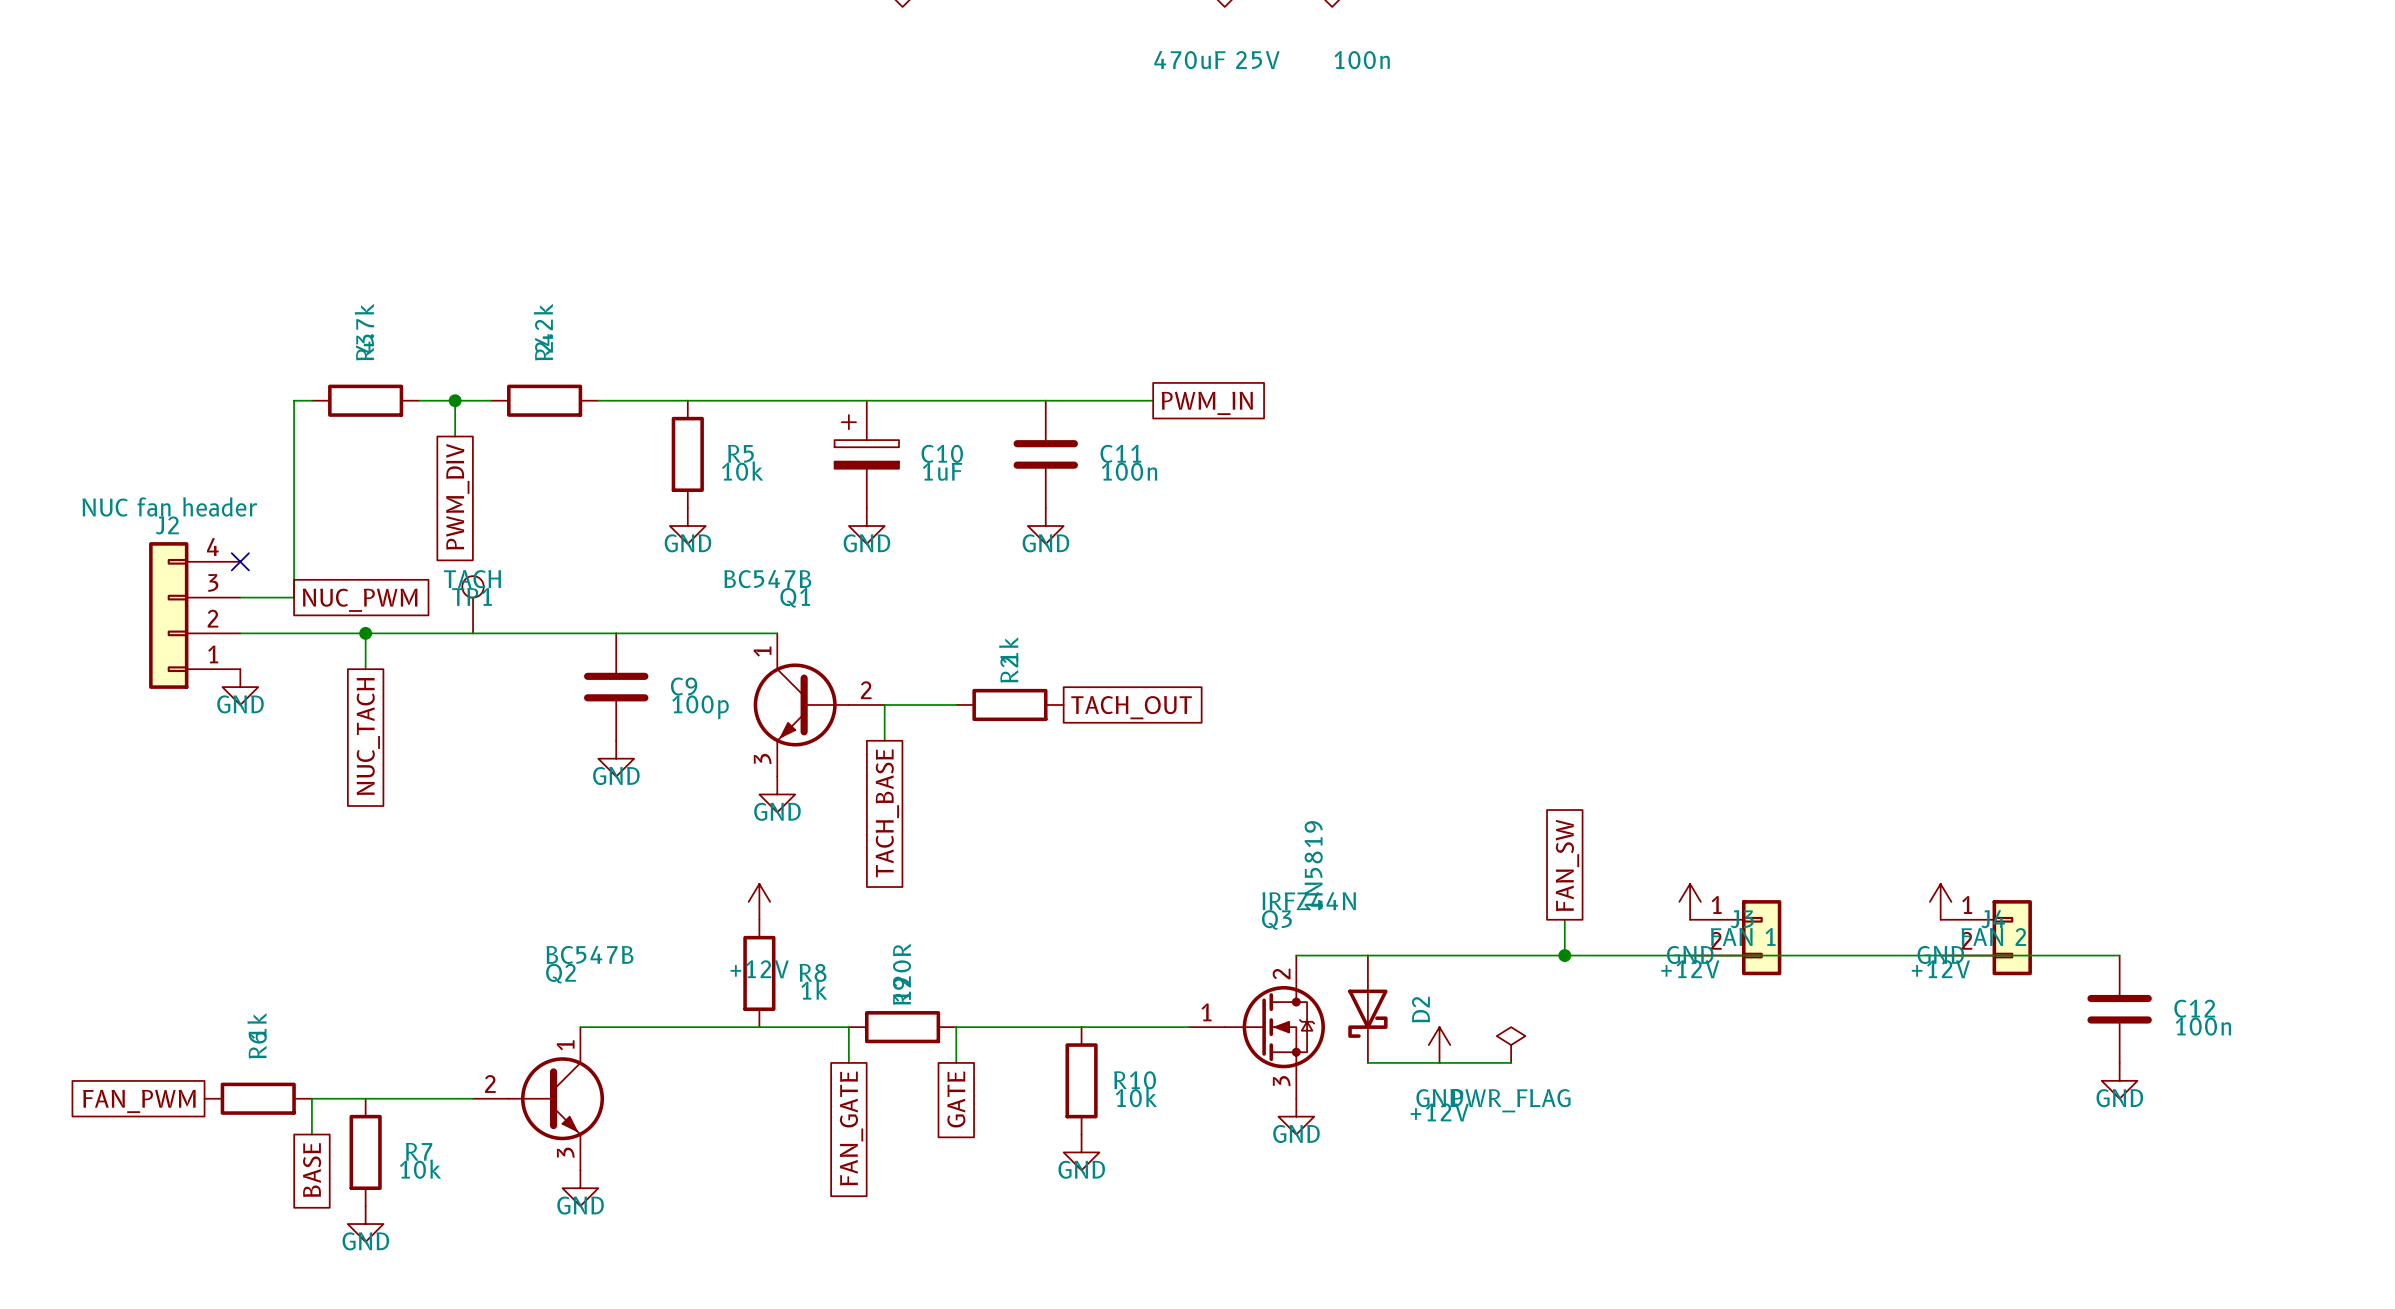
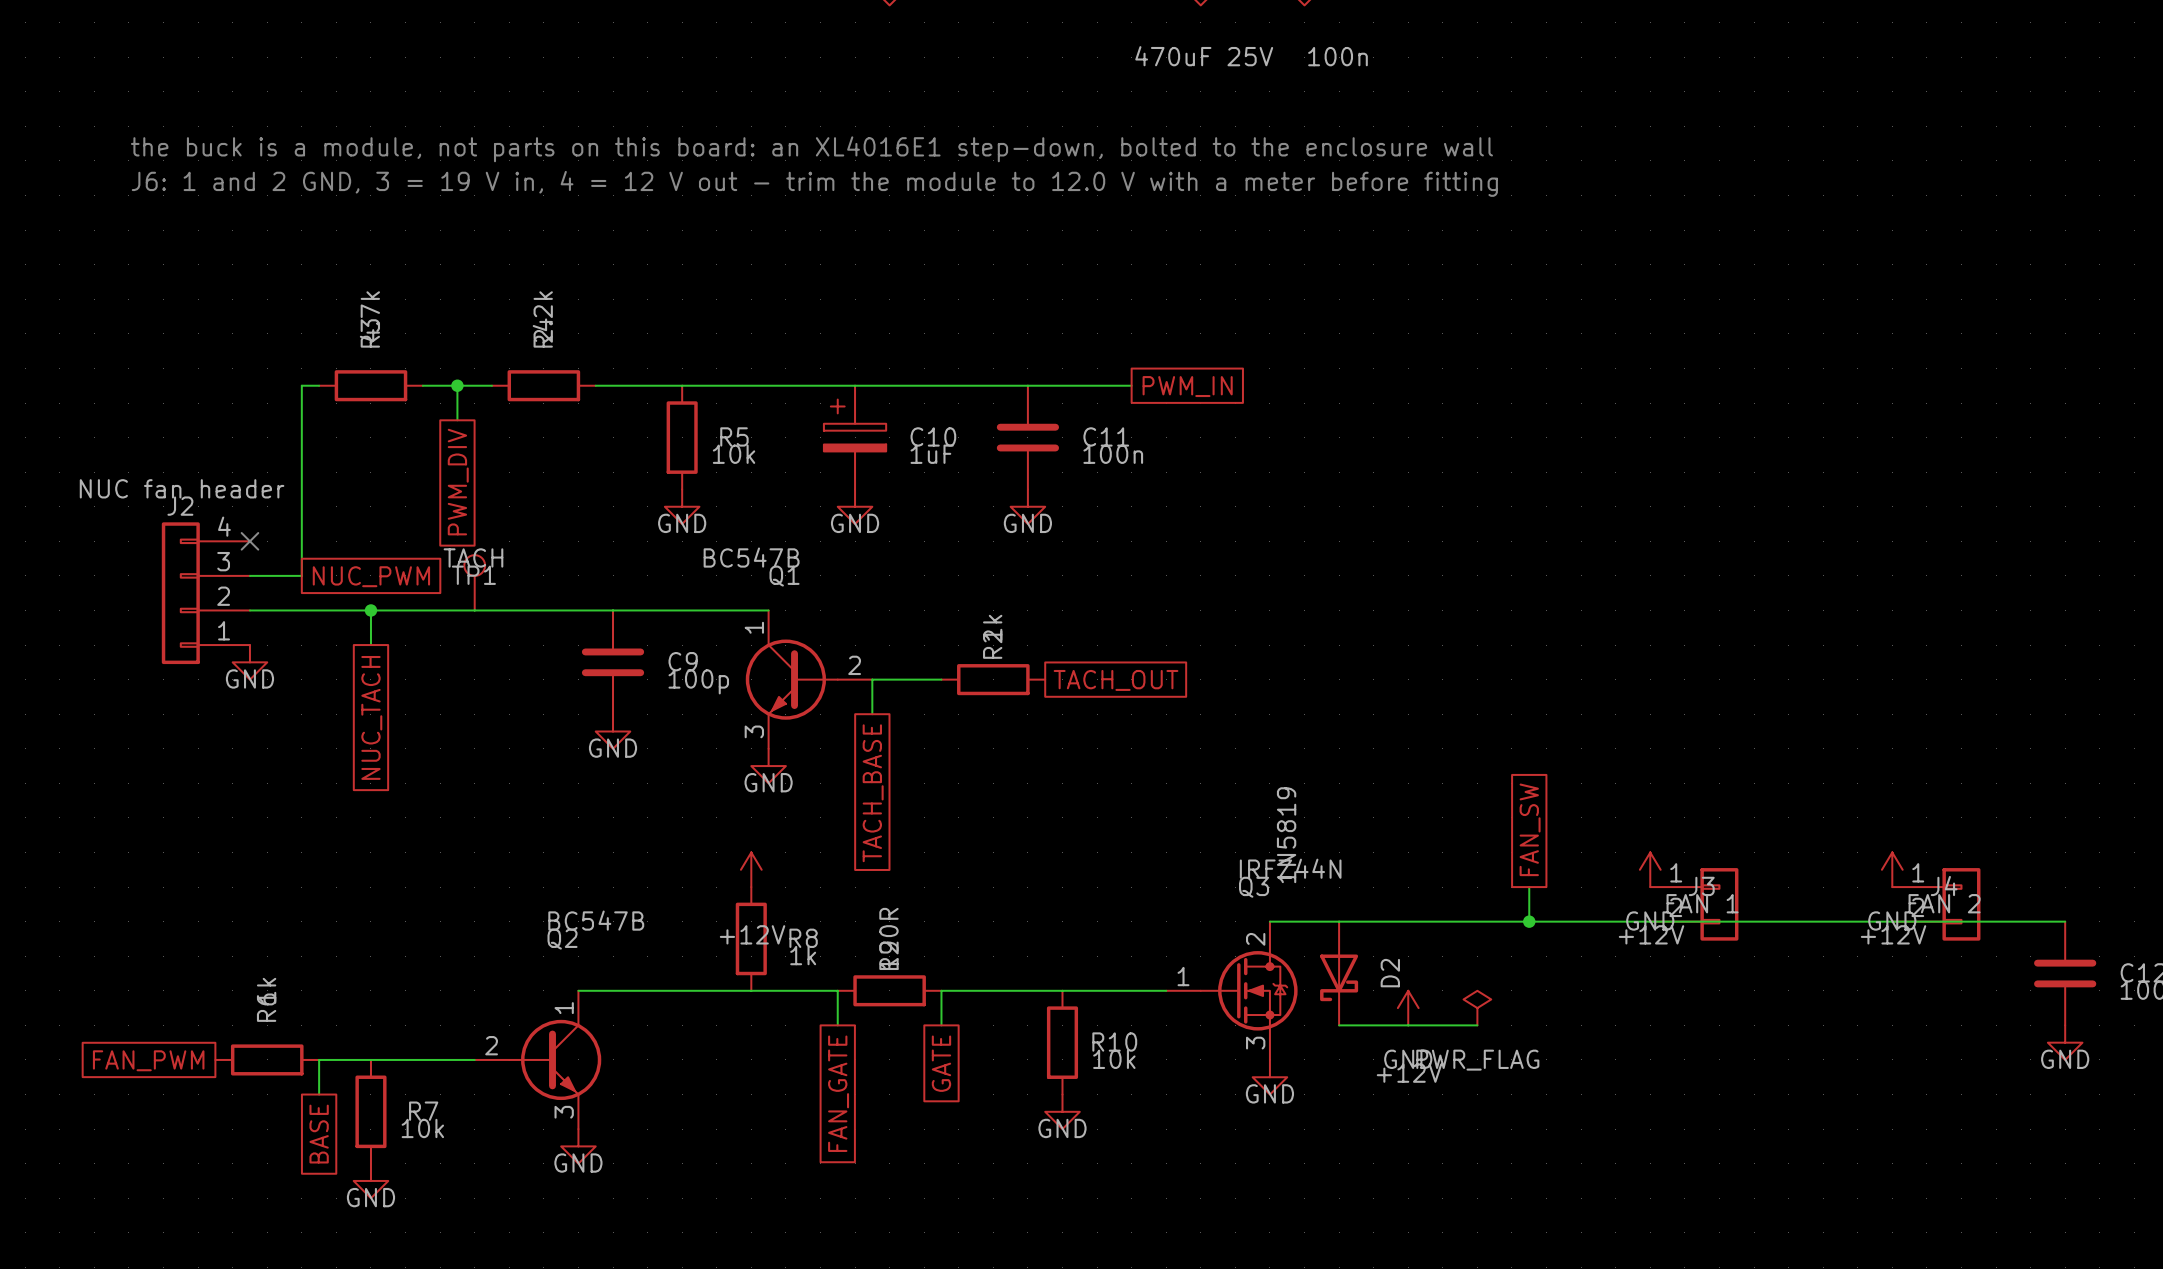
text: none -> the buck is a module, not parts on this board: an XL4016E1 step-down, bolted to the enclosure wall (811, 149)
text: none -> J6: 1 and 2 GND, 3 = 19 V in, 4 = 12 V out - trim the module to 12.0 V with a meter before fitting (814, 183)

